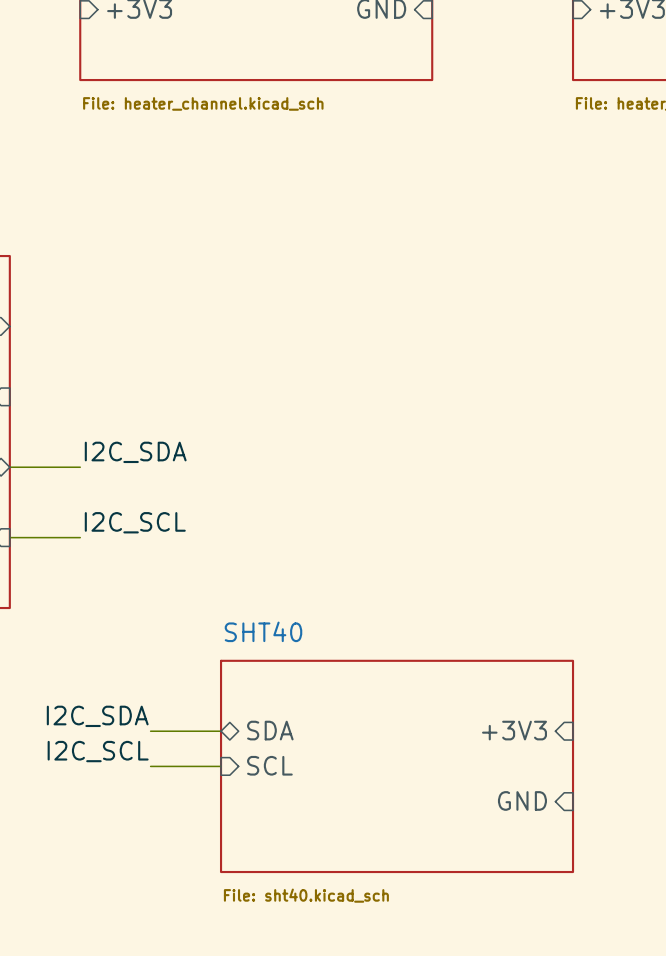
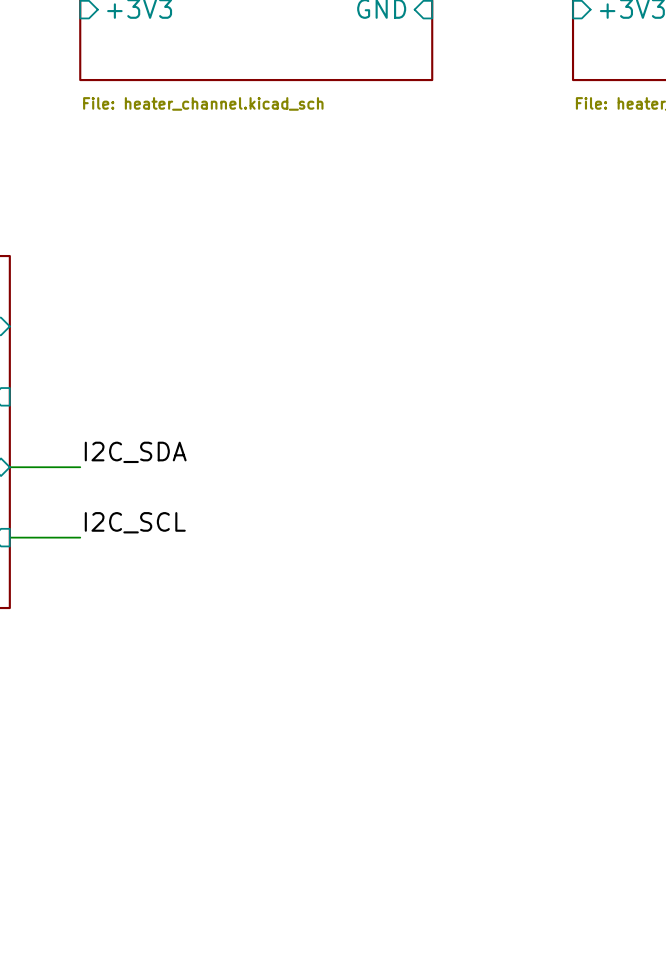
label: I2C_SDA (97, 716) -> none
sheet pin: SDA (270, 730) -> none
sheet pin: +3V3 (514, 730) -> none
wire: (150, 731) (221, 731) -> none
label: I2C_SCL (98, 751) -> none
sheet pin: SCL (269, 765) -> none
wire: (150, 766) (221, 766) -> none
sheet SHT40: File: sht40.kicad_sch (397, 766) -> none
sheet pin: GND (522, 800) -> none

